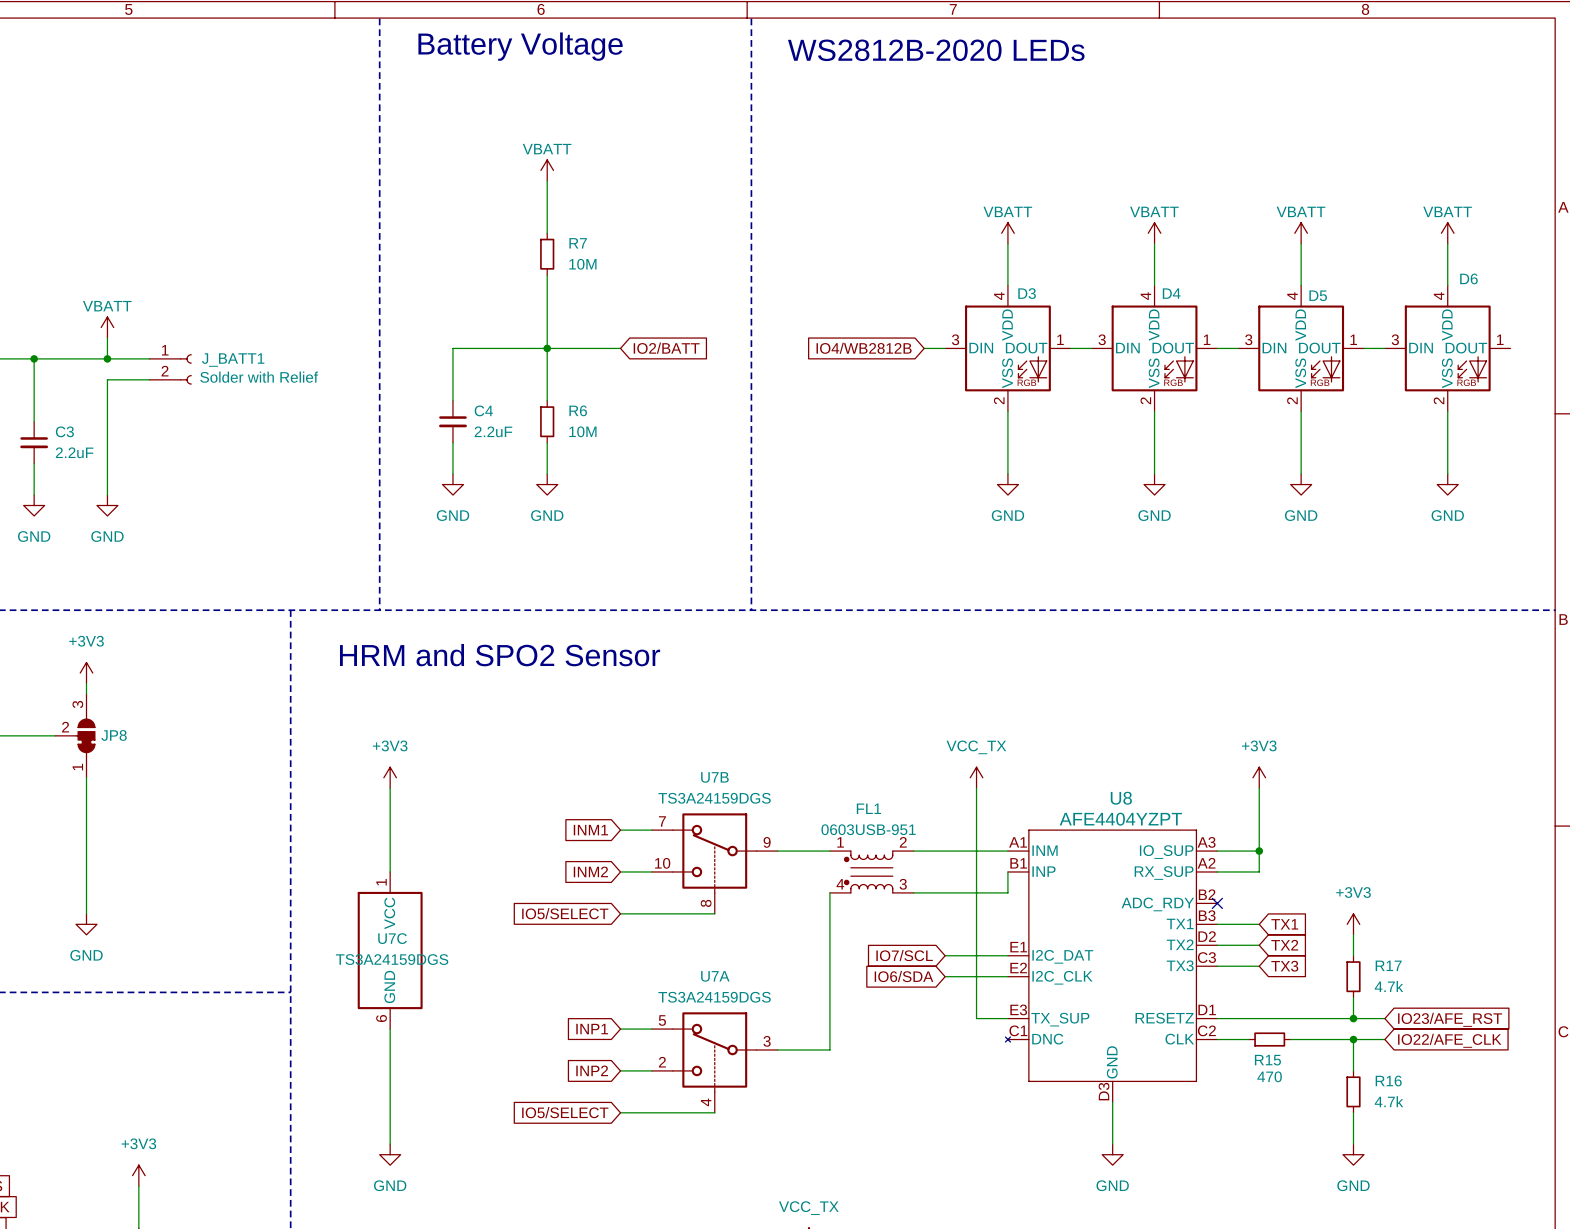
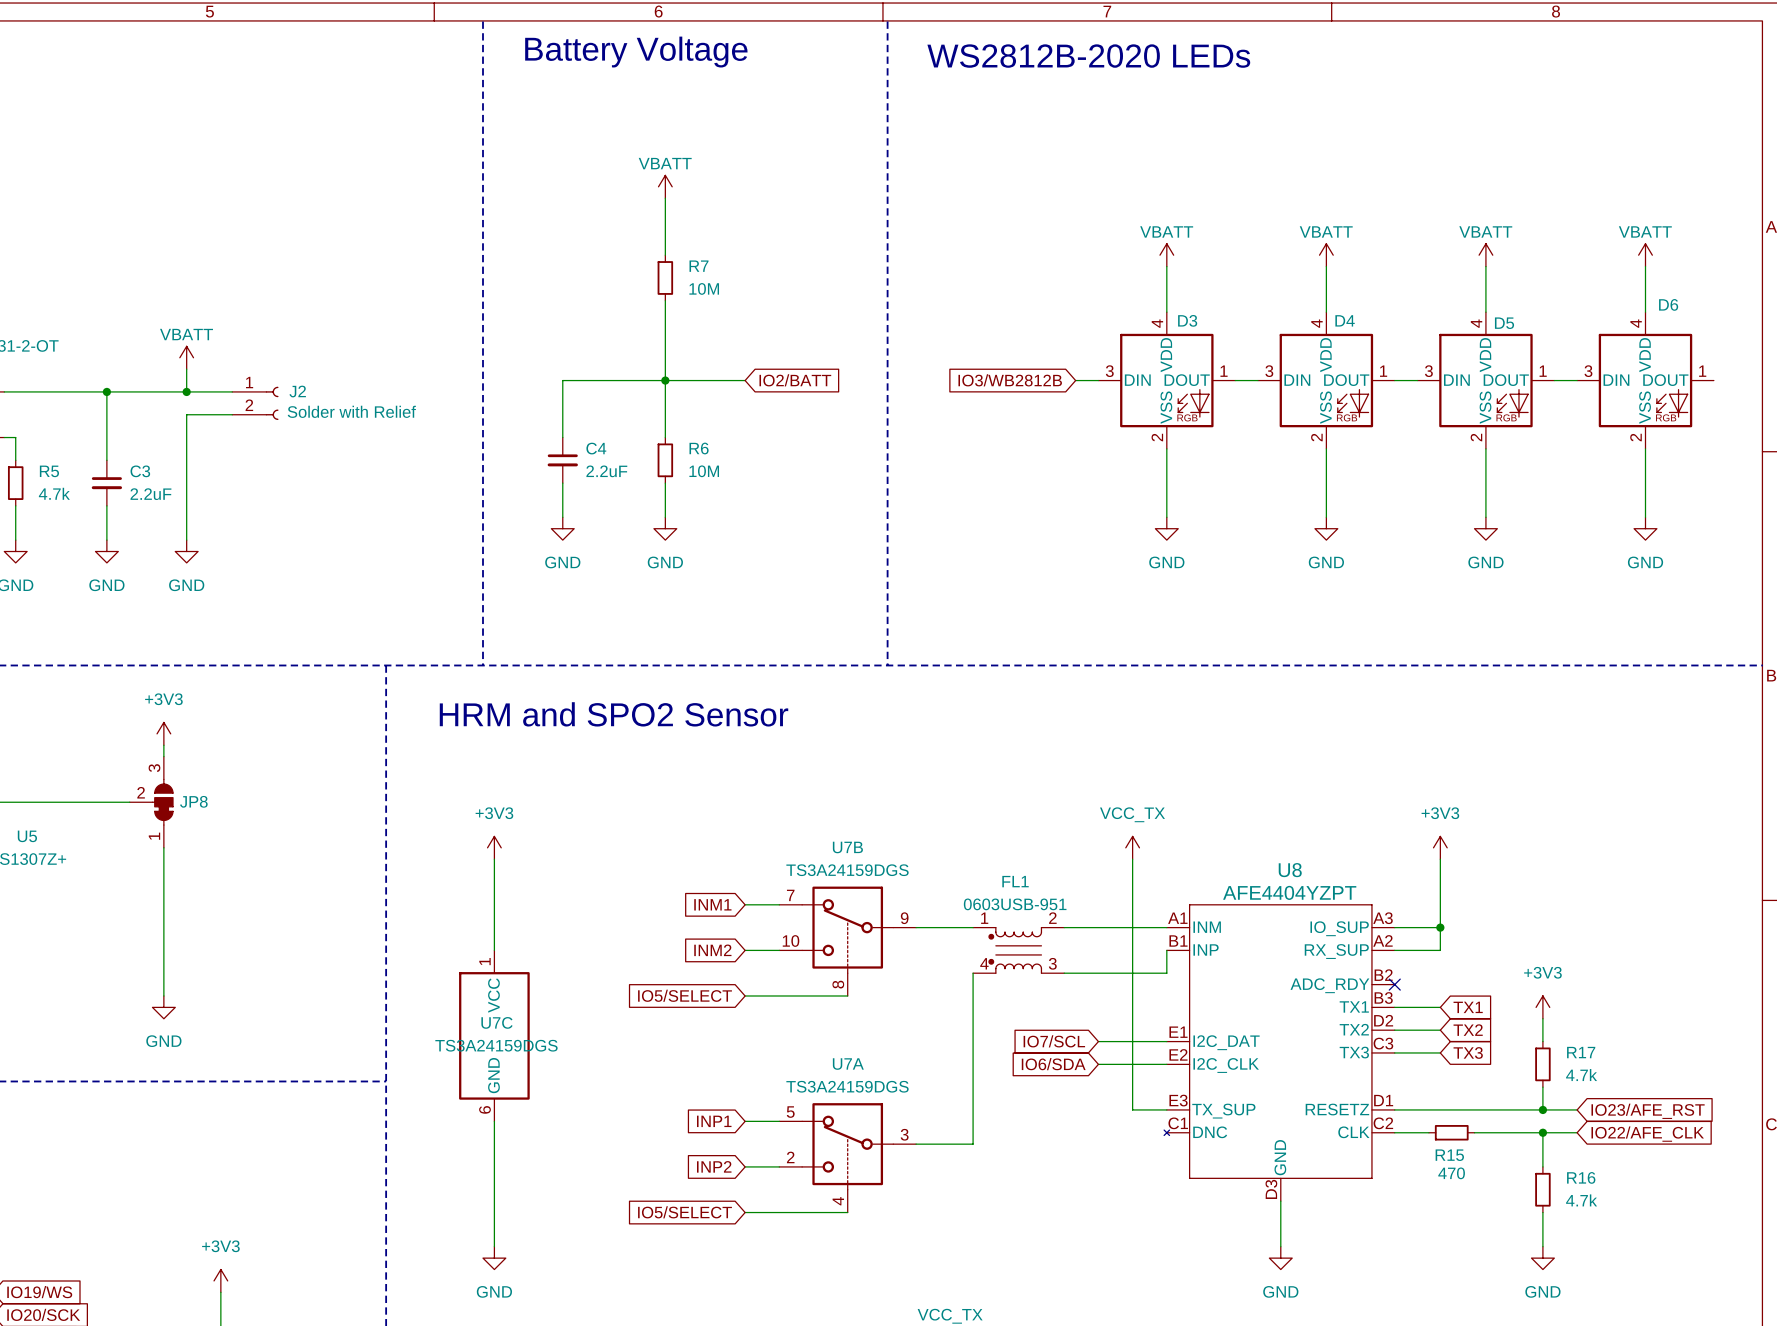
global label: IO4/WB2812B (864, 348) -> IO3/WB2812B (1010, 380)
J_BATT1 name: J_BATT1 (233, 360) -> J2 (297, 391)

